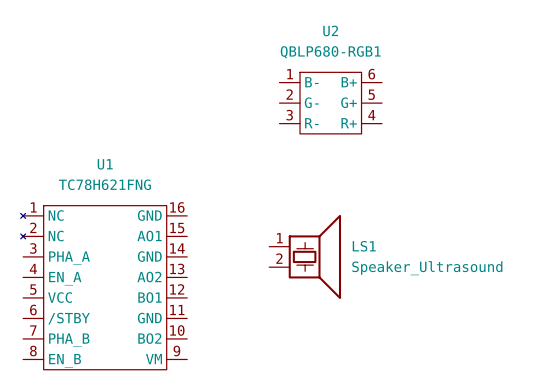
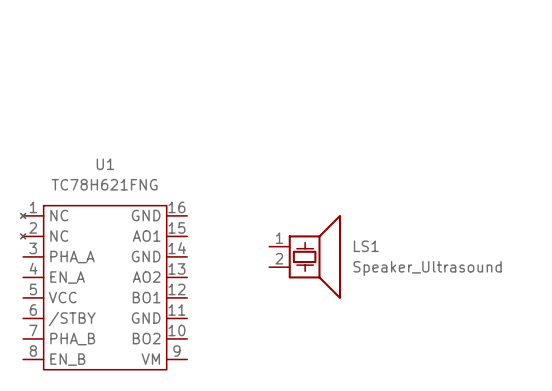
U2: QBLP680-RGB1 (330, 103) -> none

